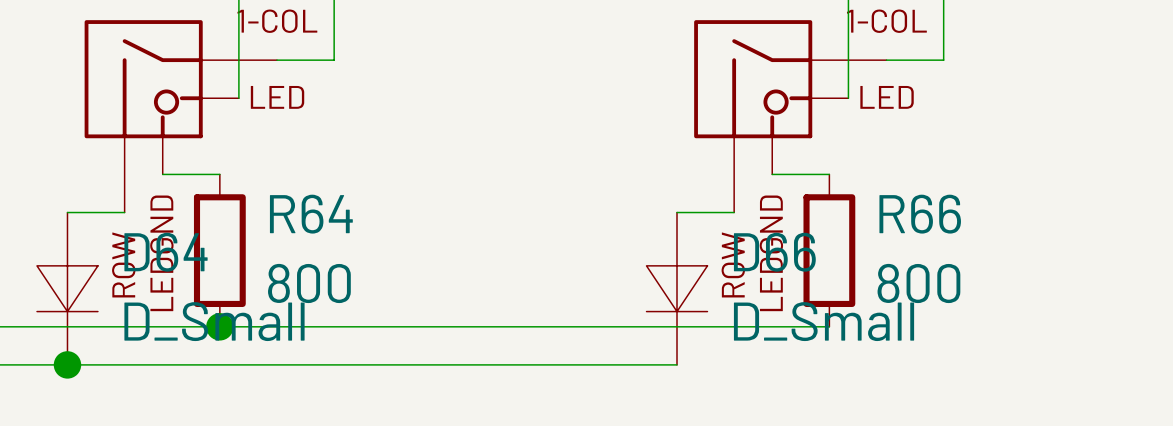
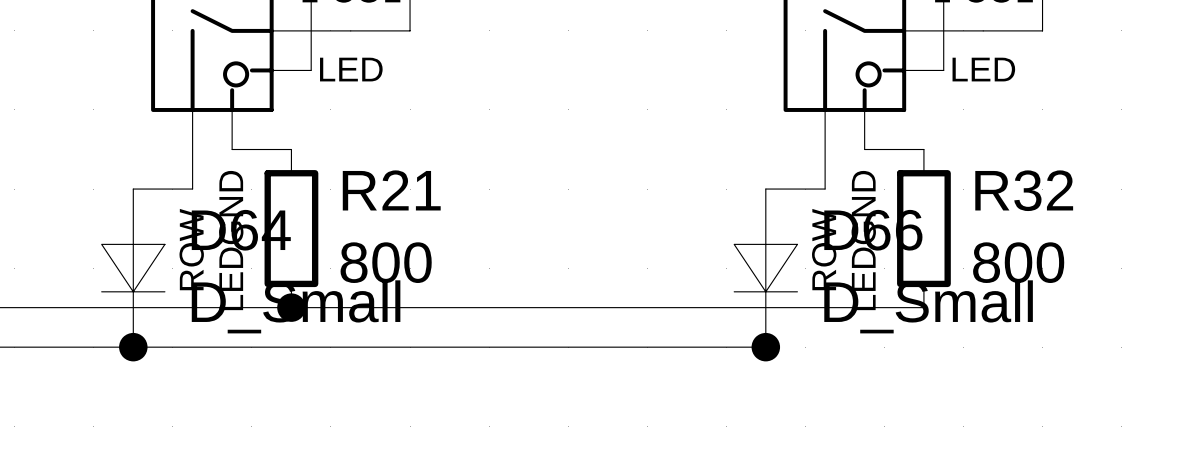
R64 name: R64 (311, 214) -> R21 (391, 190)
R66 name: R66 (920, 214) -> R32 (1024, 190)
junction: none -> (765, 347)

